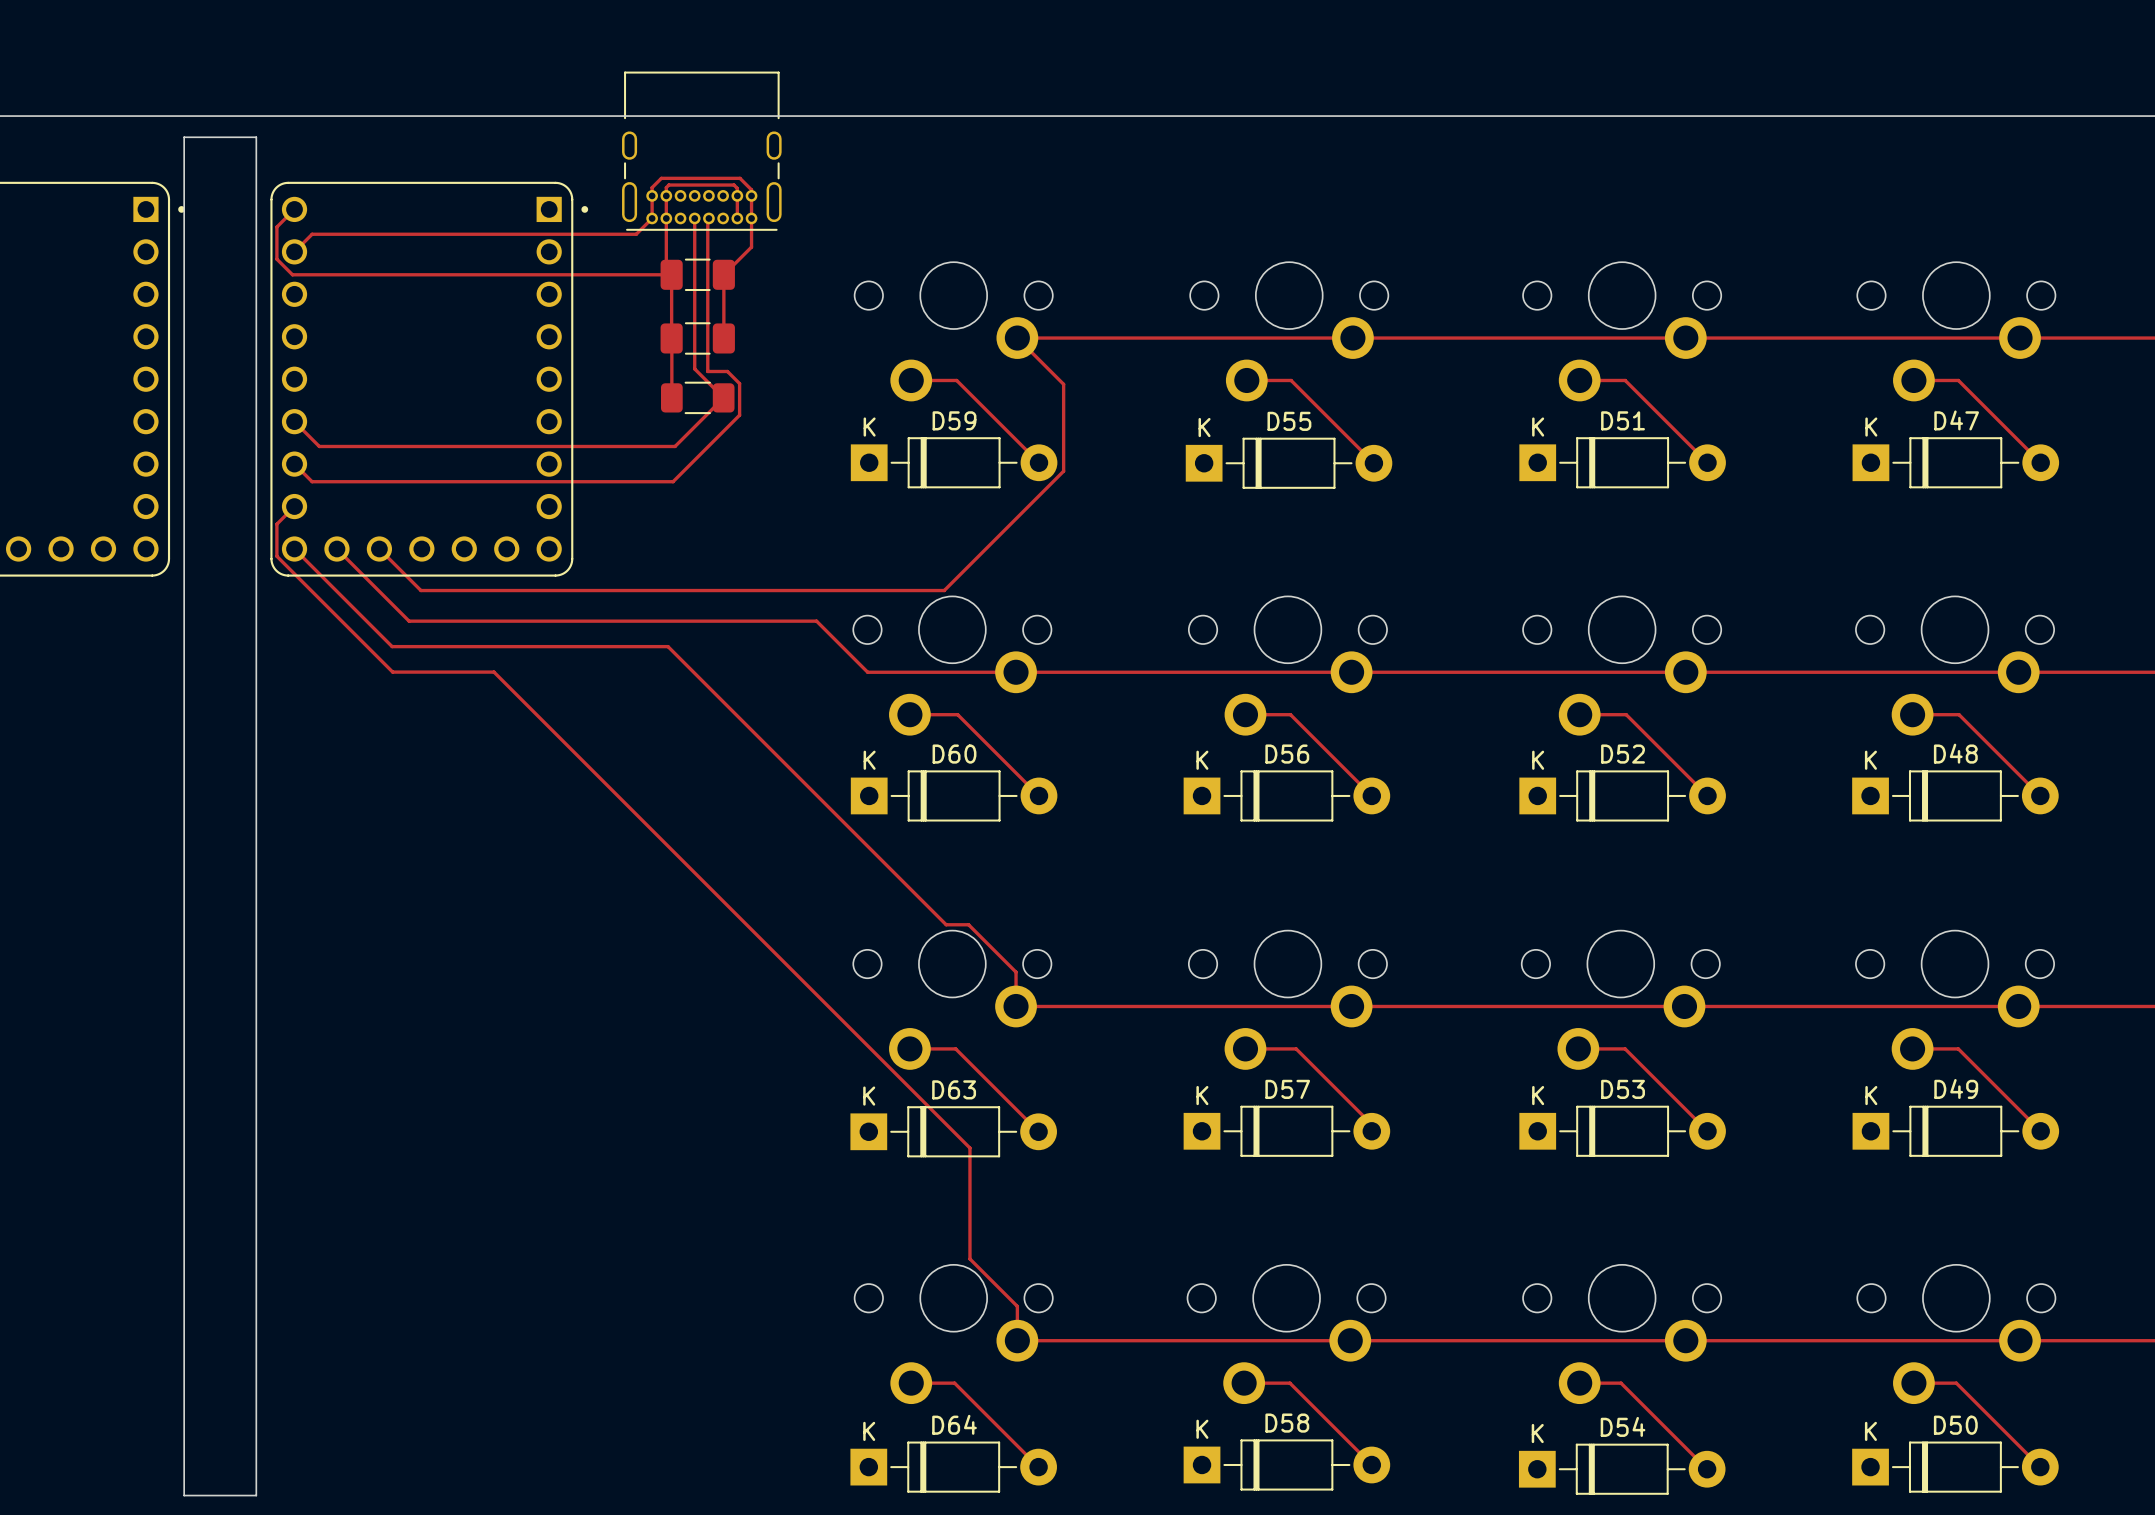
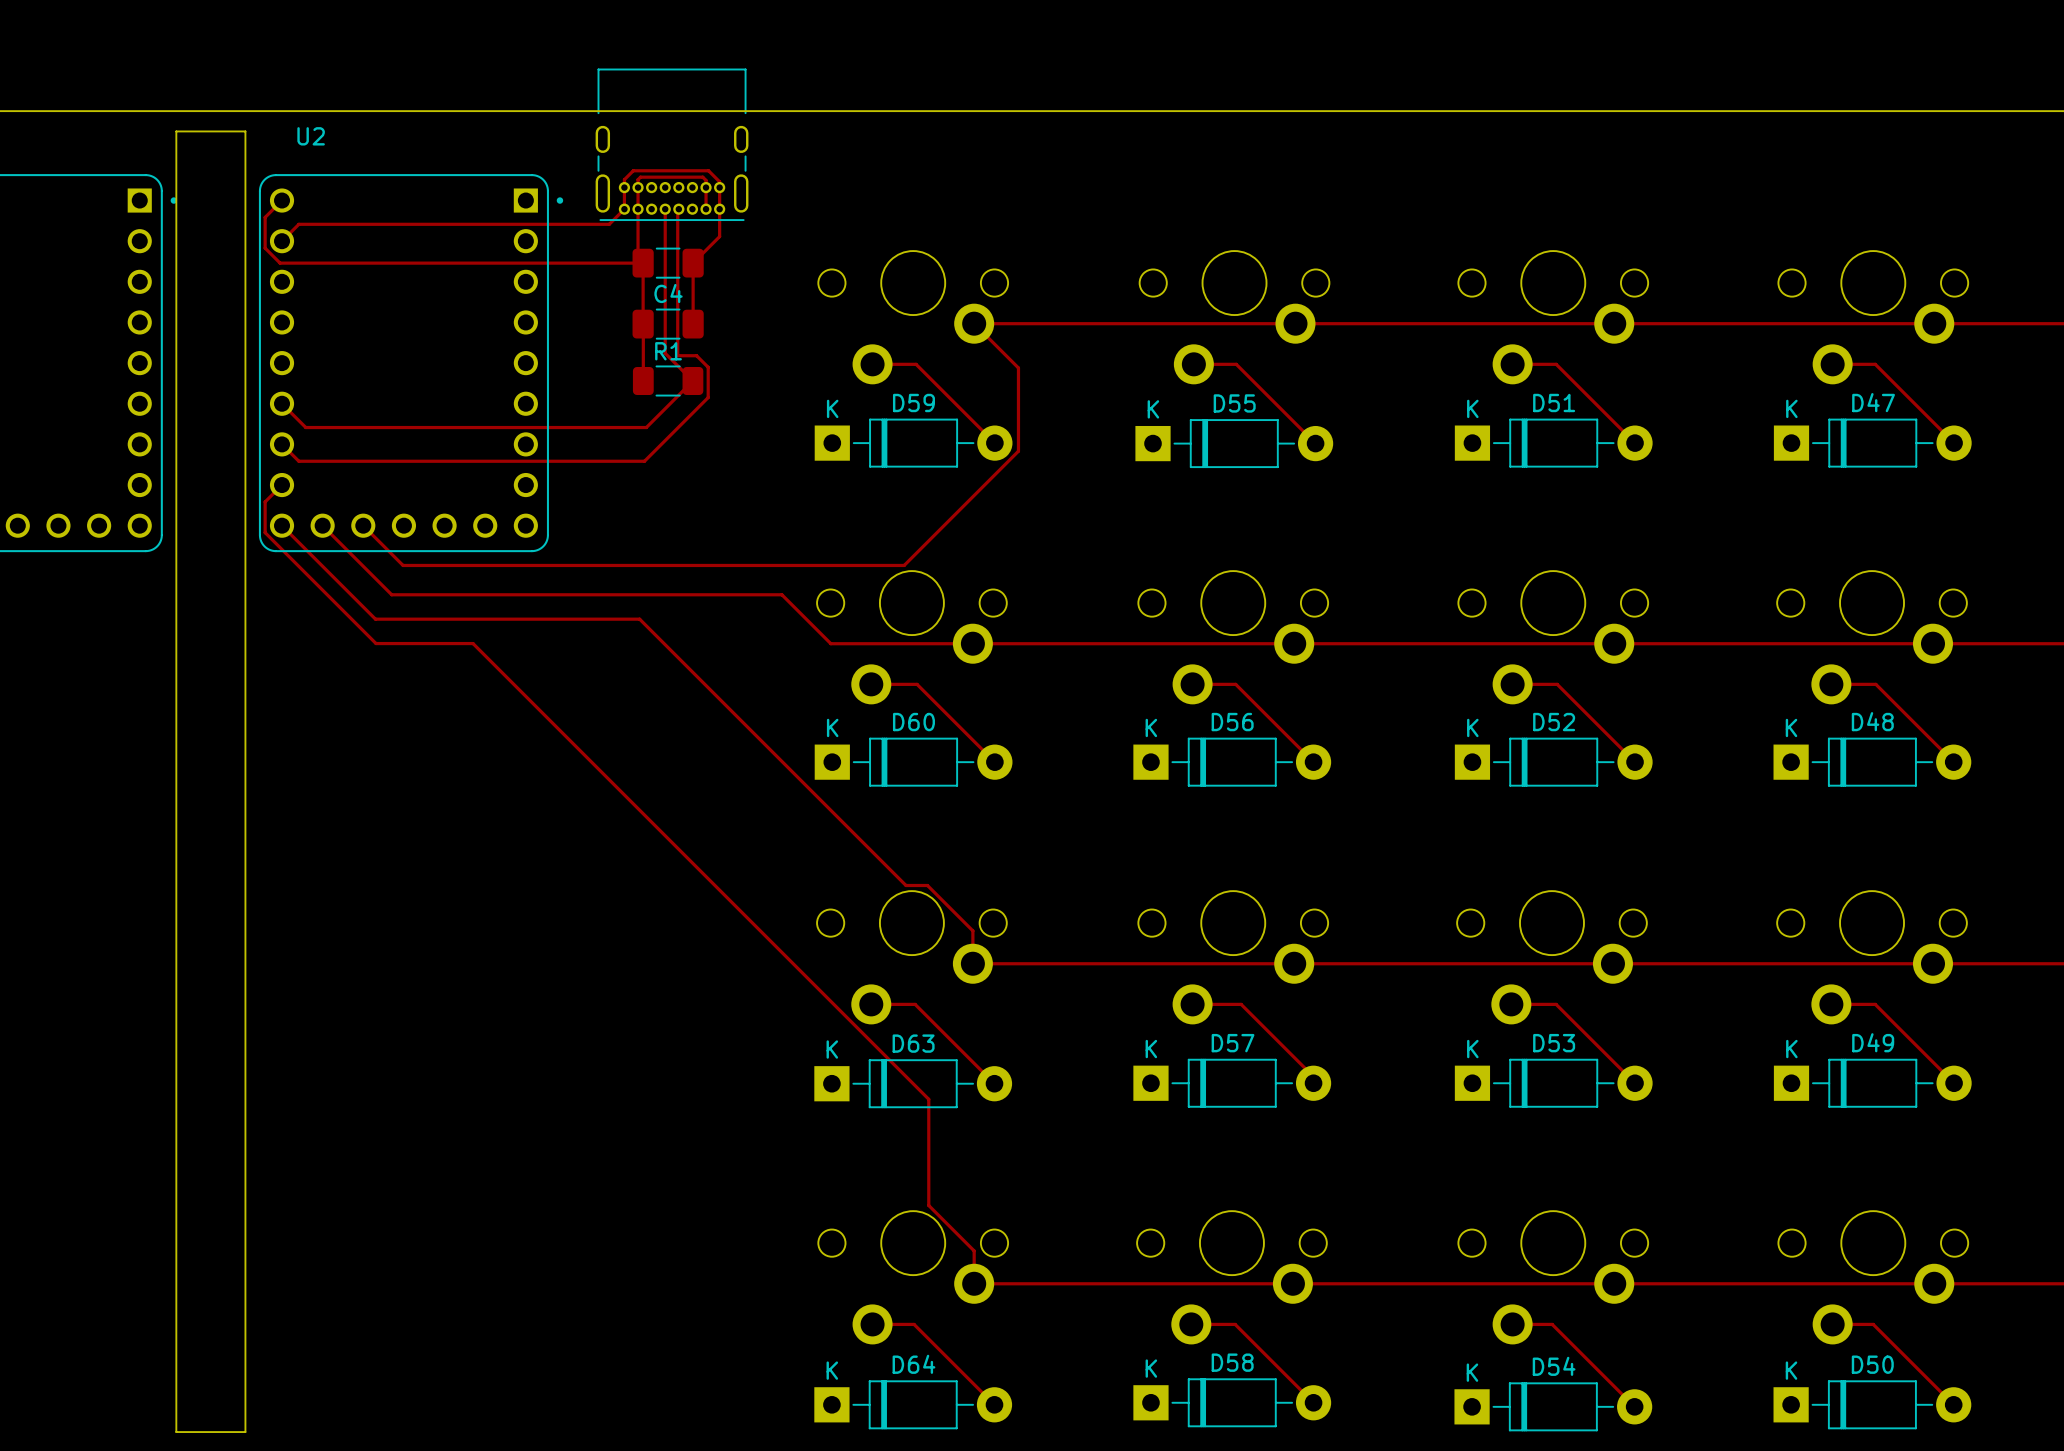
U2 name: none -> U2 (311, 136)
C4 name: none -> C4 (668, 293)
R1 name: none -> R1 (668, 351)

